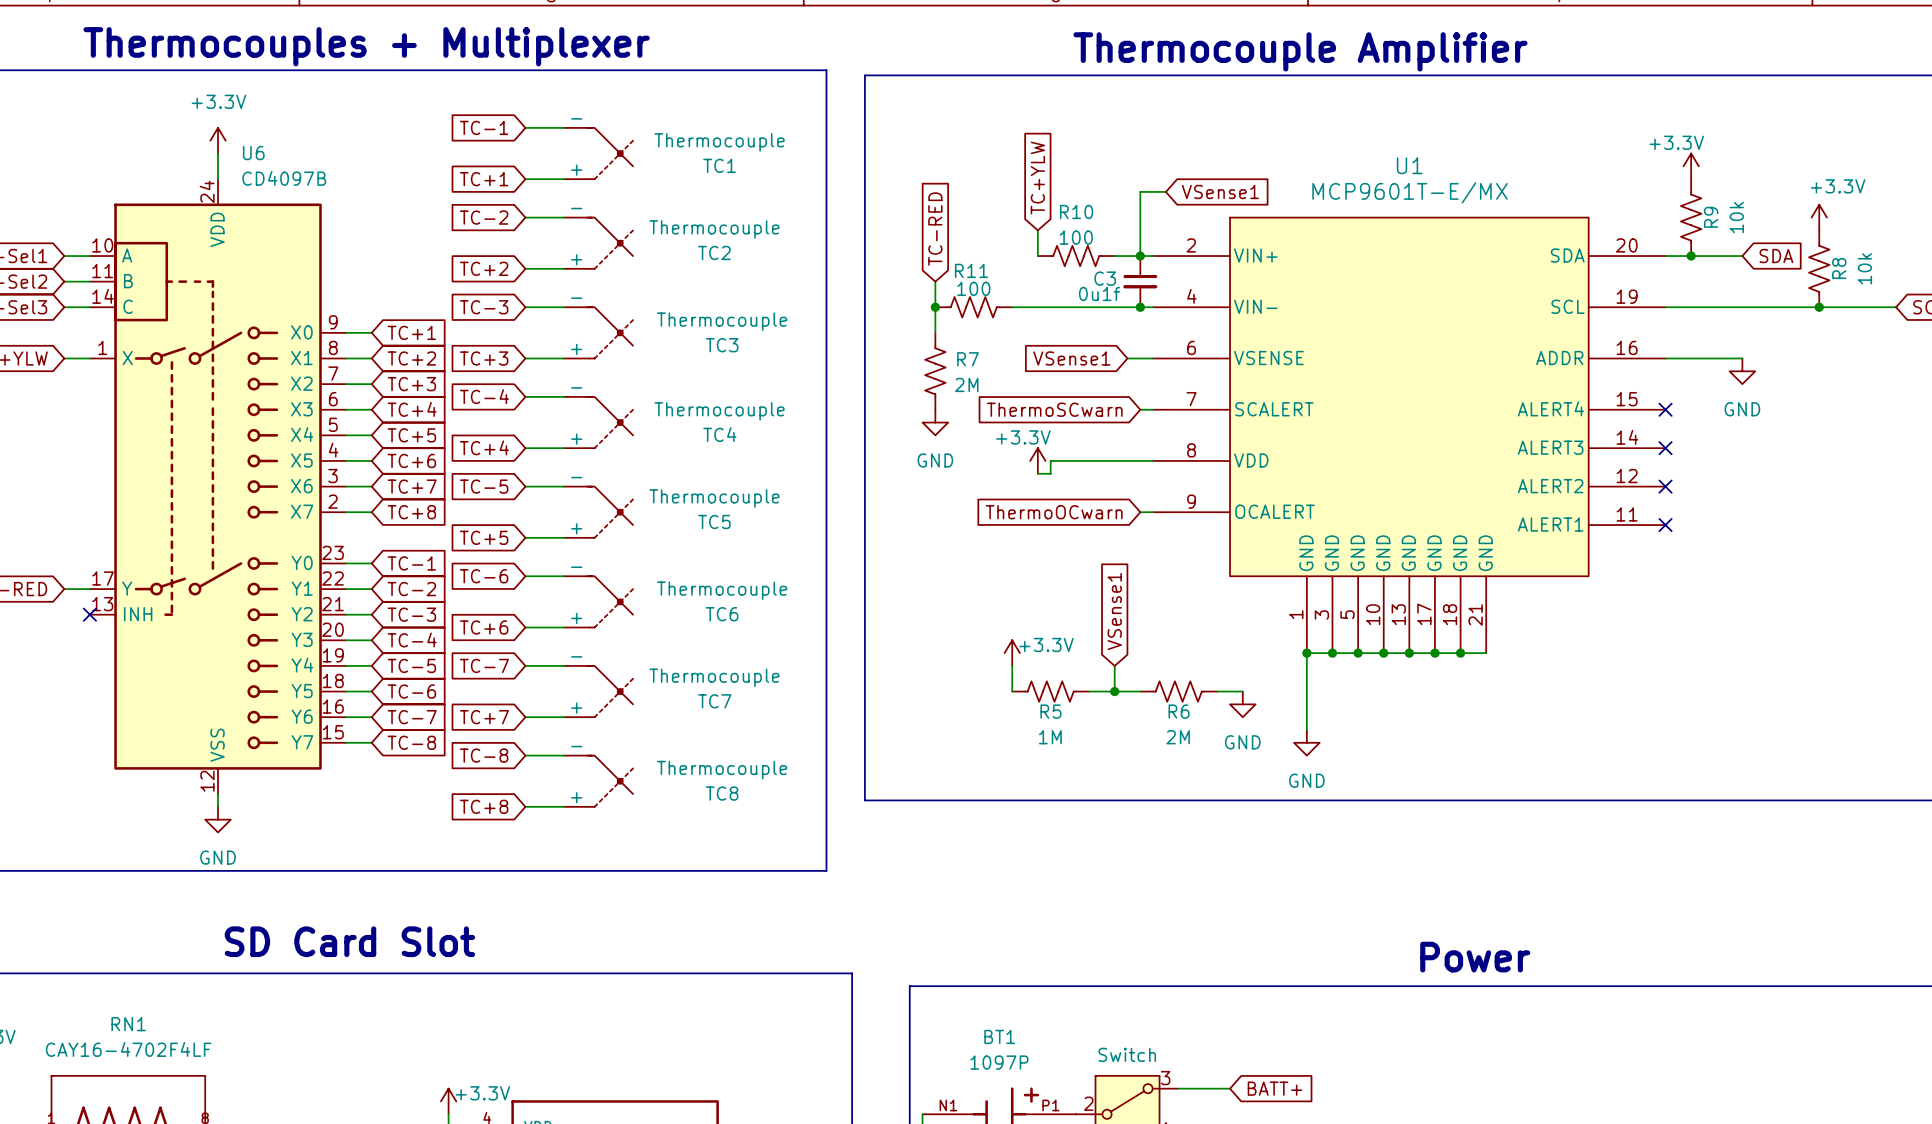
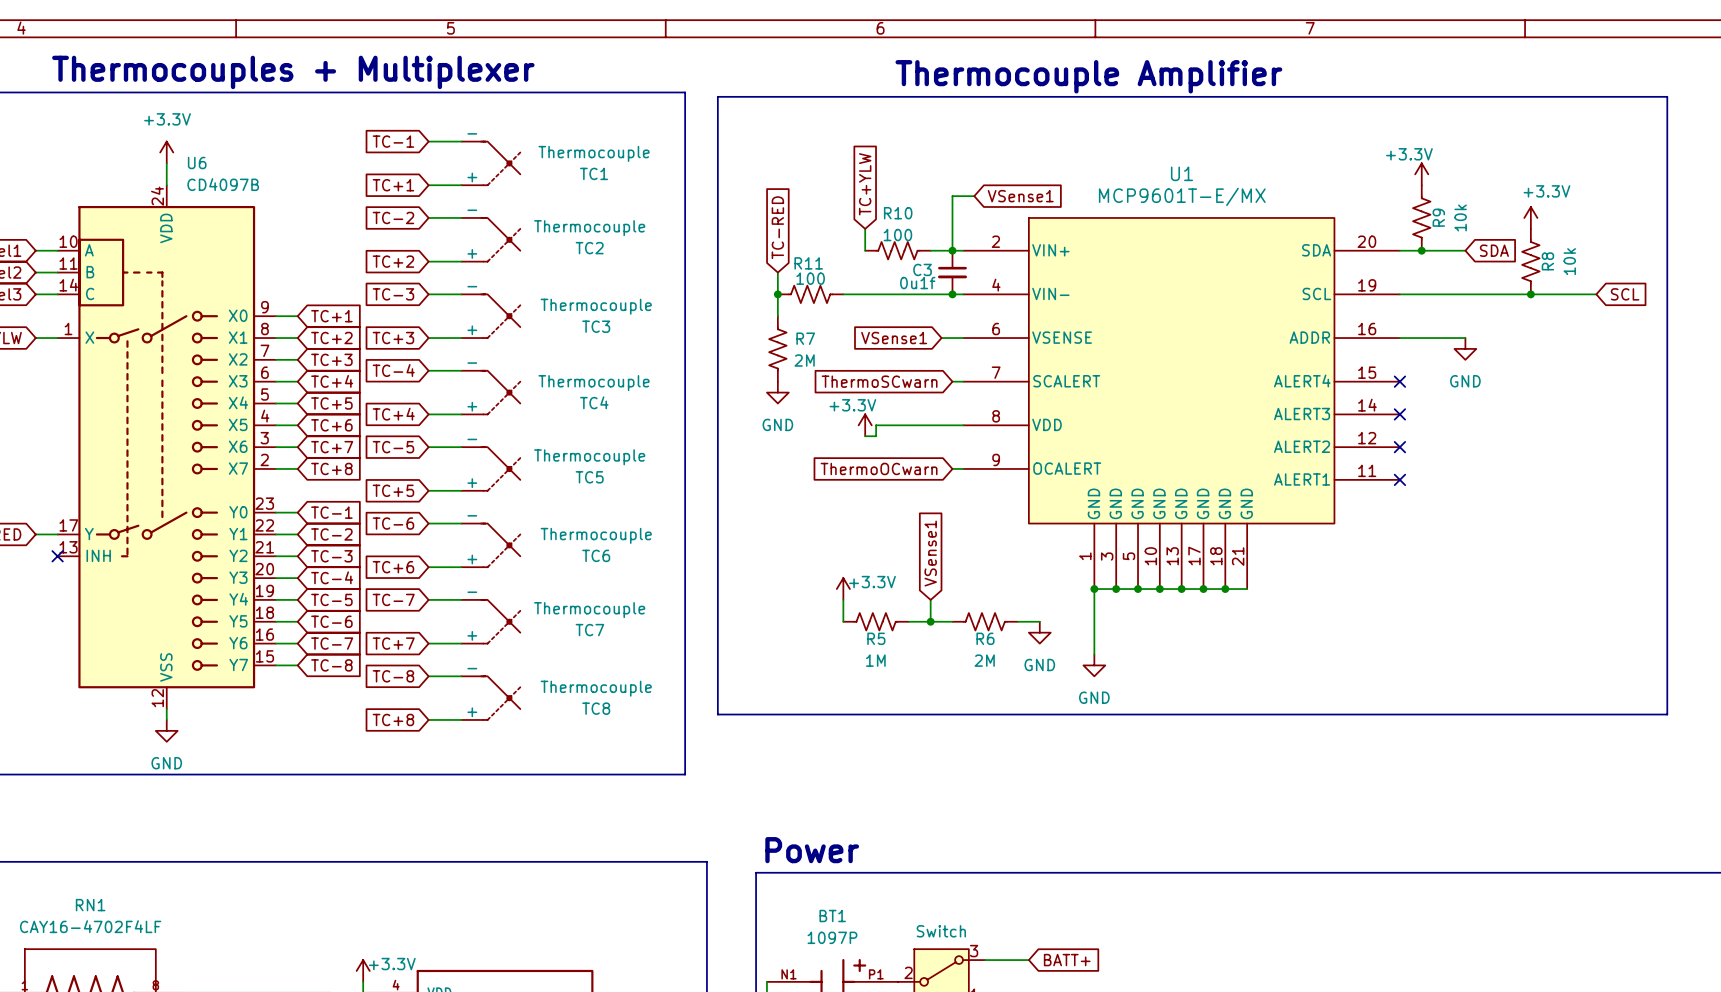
text: SD Card Slot (349, 941) -> none
text: Power (1475, 957) -> none
text: none -> Power (812, 850)

